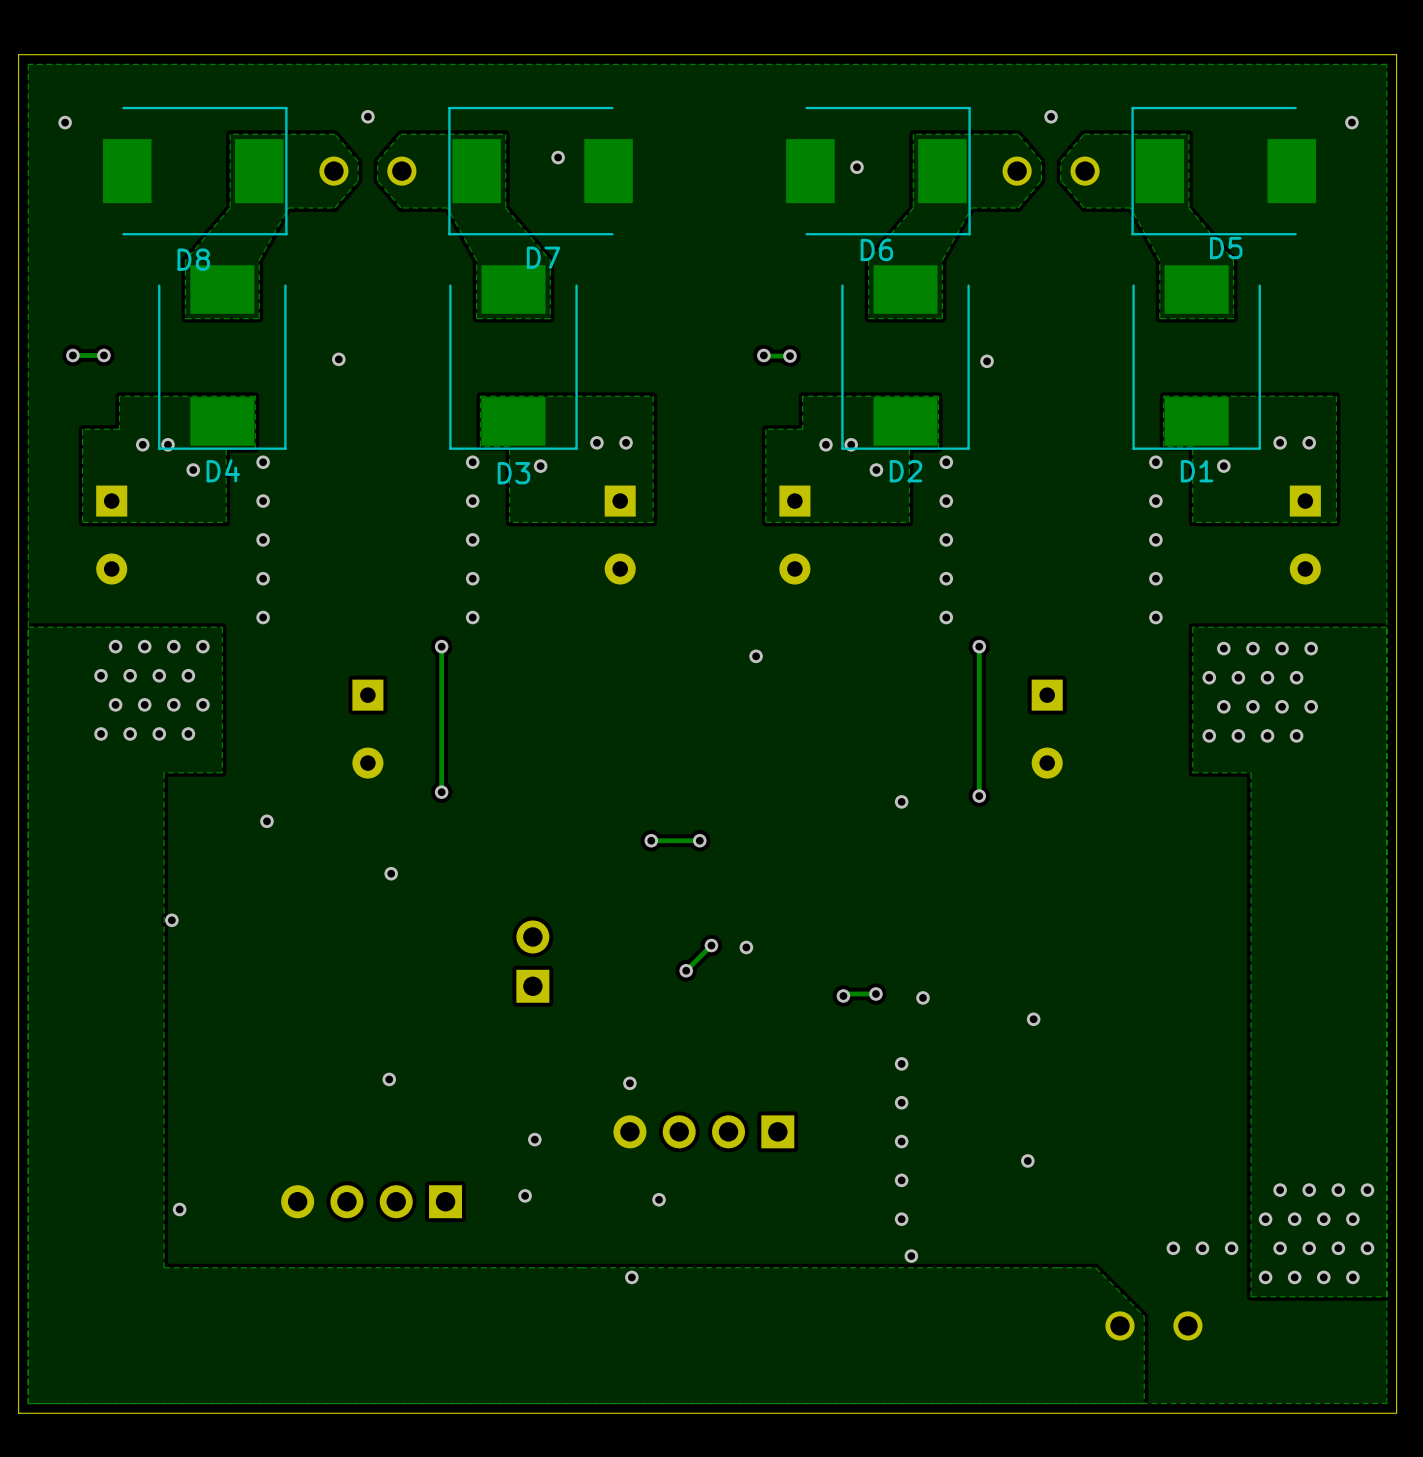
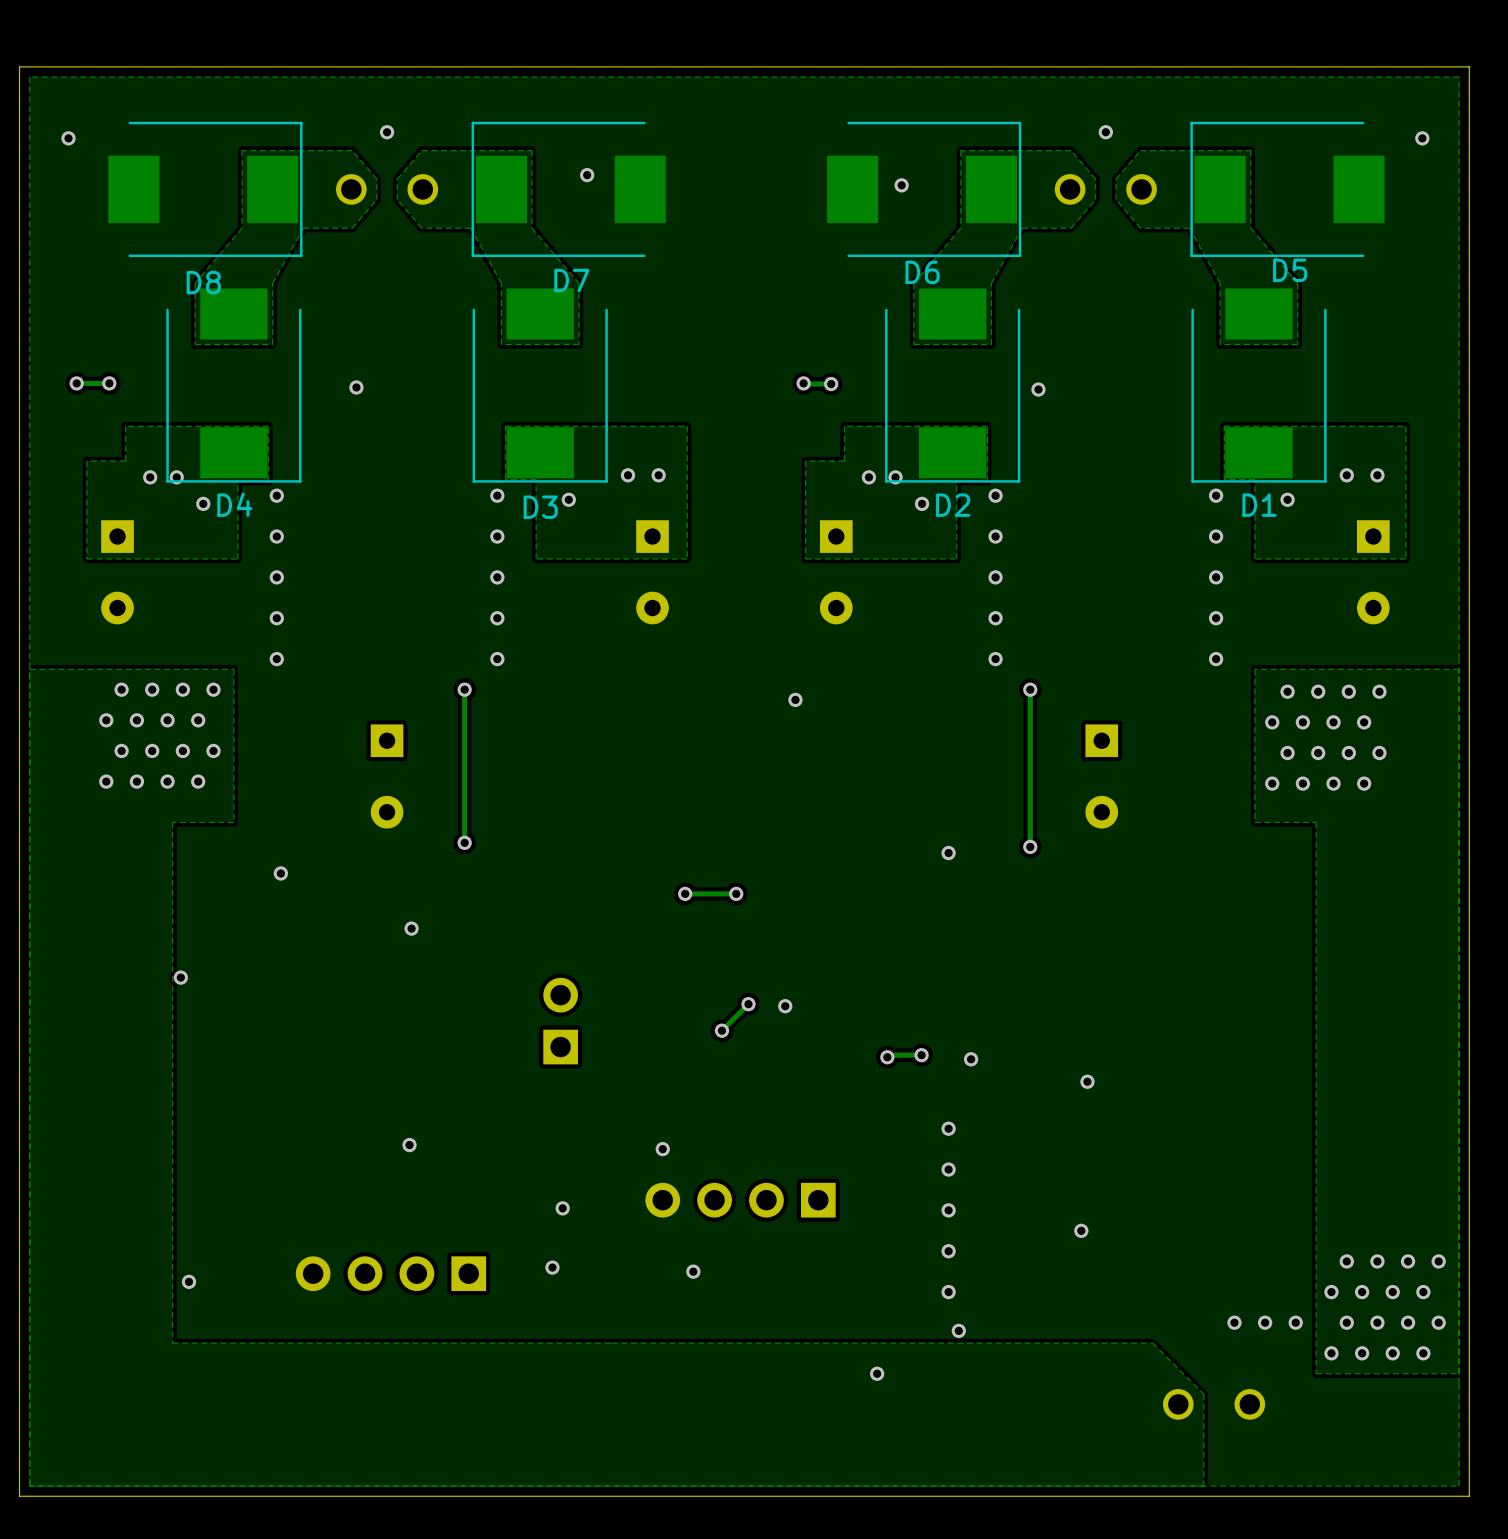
via: (631, 1277) -> none
via: none -> (877, 1373)

